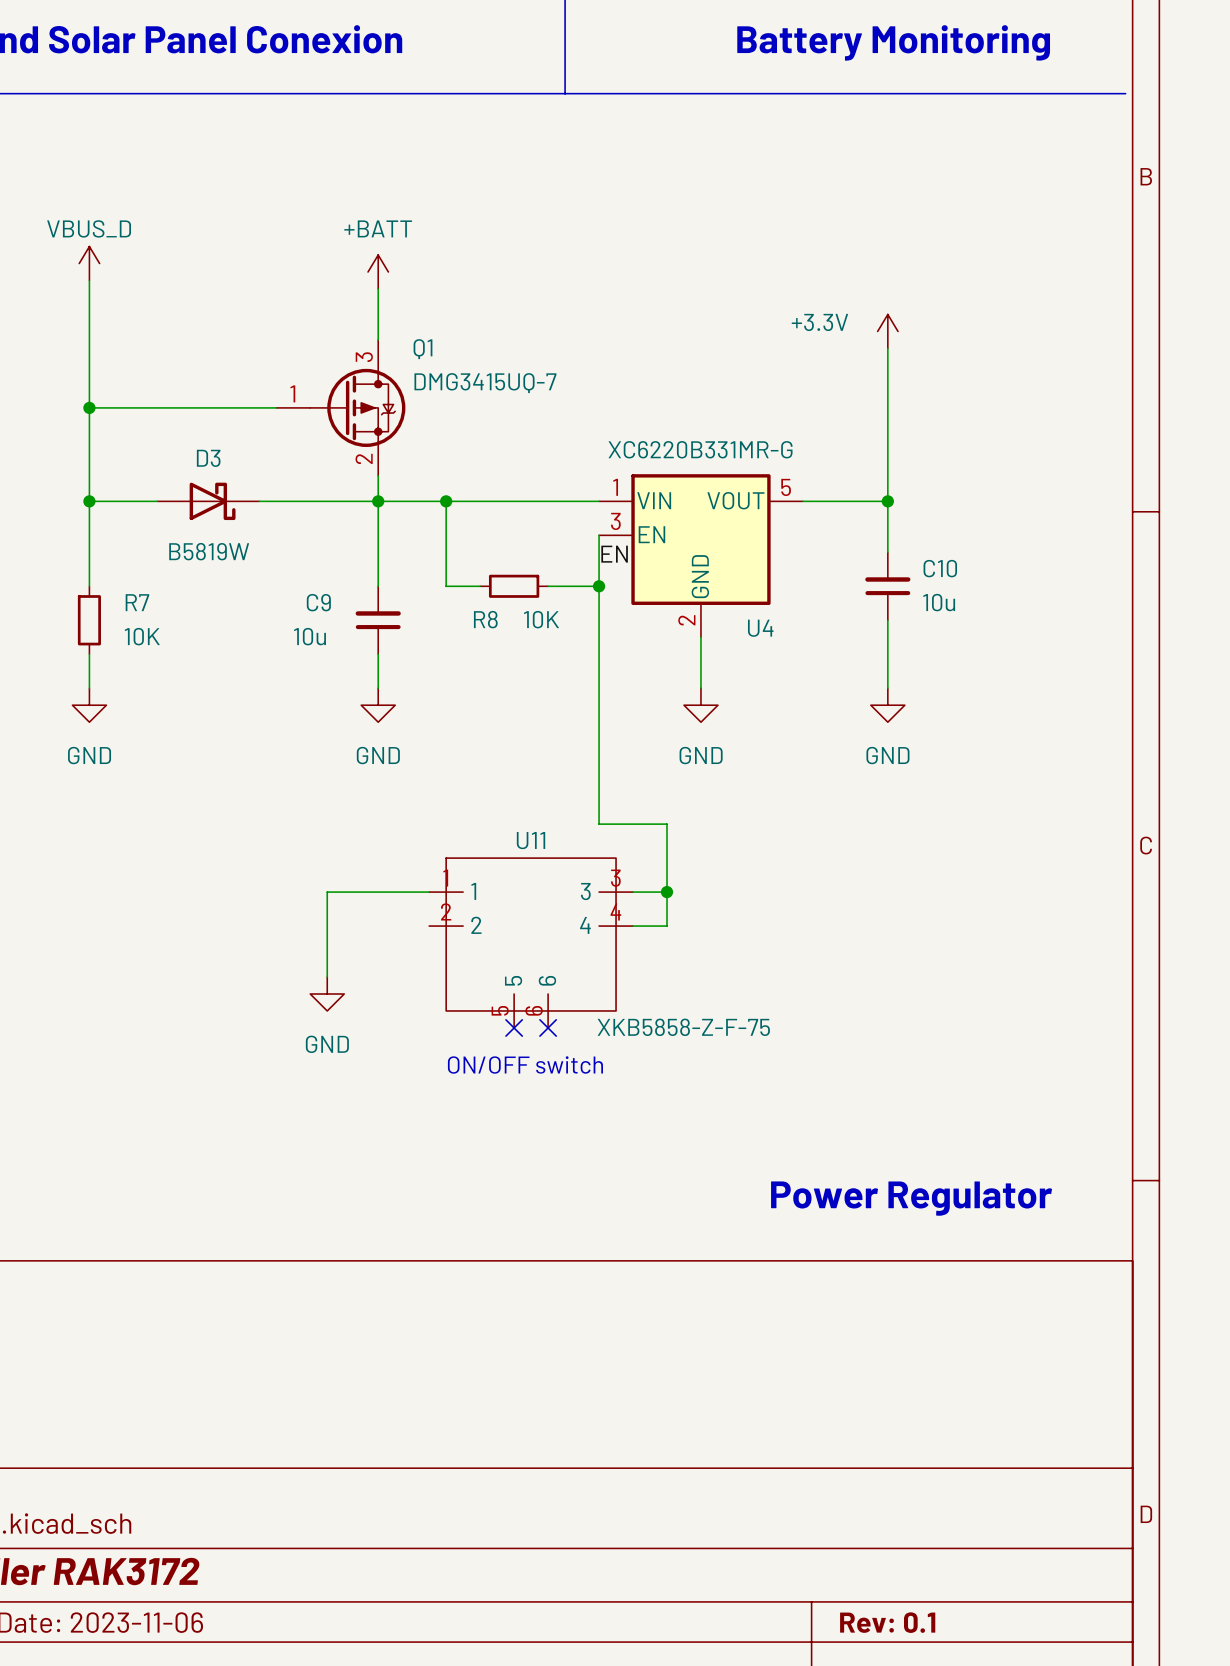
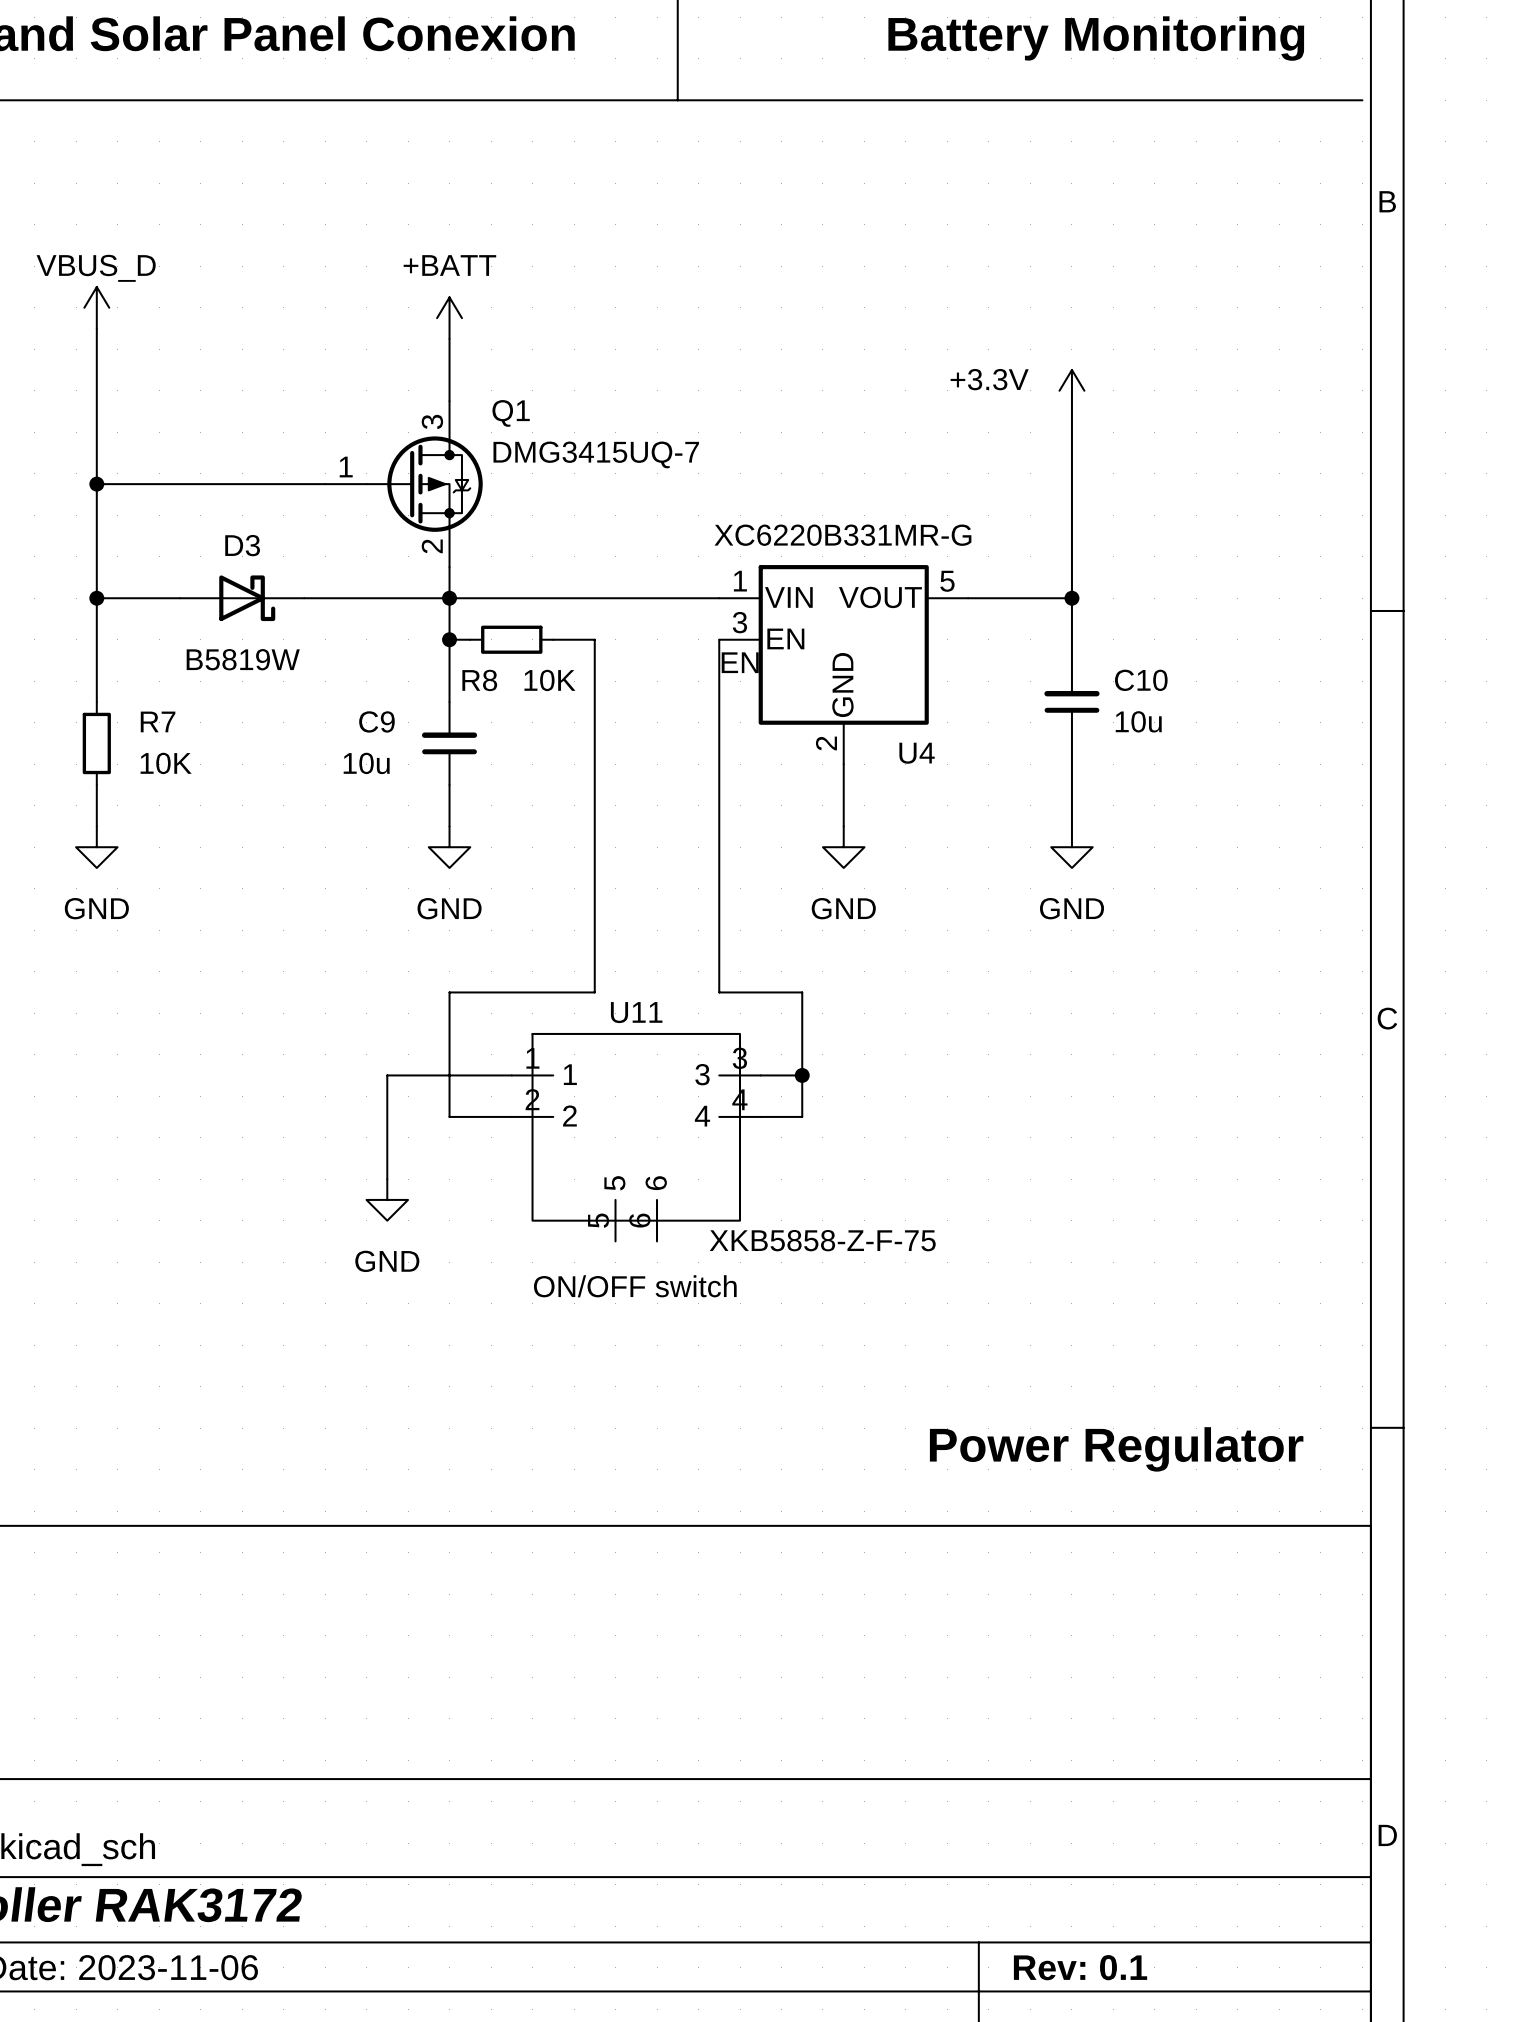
wire: (446, 501) (446, 586) (480, 586) -> none
junction position: (446, 501) -> (449, 639)
wire: none -> (449, 639) (470, 639)
wire: none -> (553, 639) (594, 639) (594, 992) (449, 992) (449, 1116) (511, 1116)
R8 position: (514, 586) -> (511, 639)
wire: (548, 586) (599, 586) -> none
junction: (599, 586) -> none
no-connect mark: (514, 1027) -> none
no-connect mark: (548, 1027) -> none

